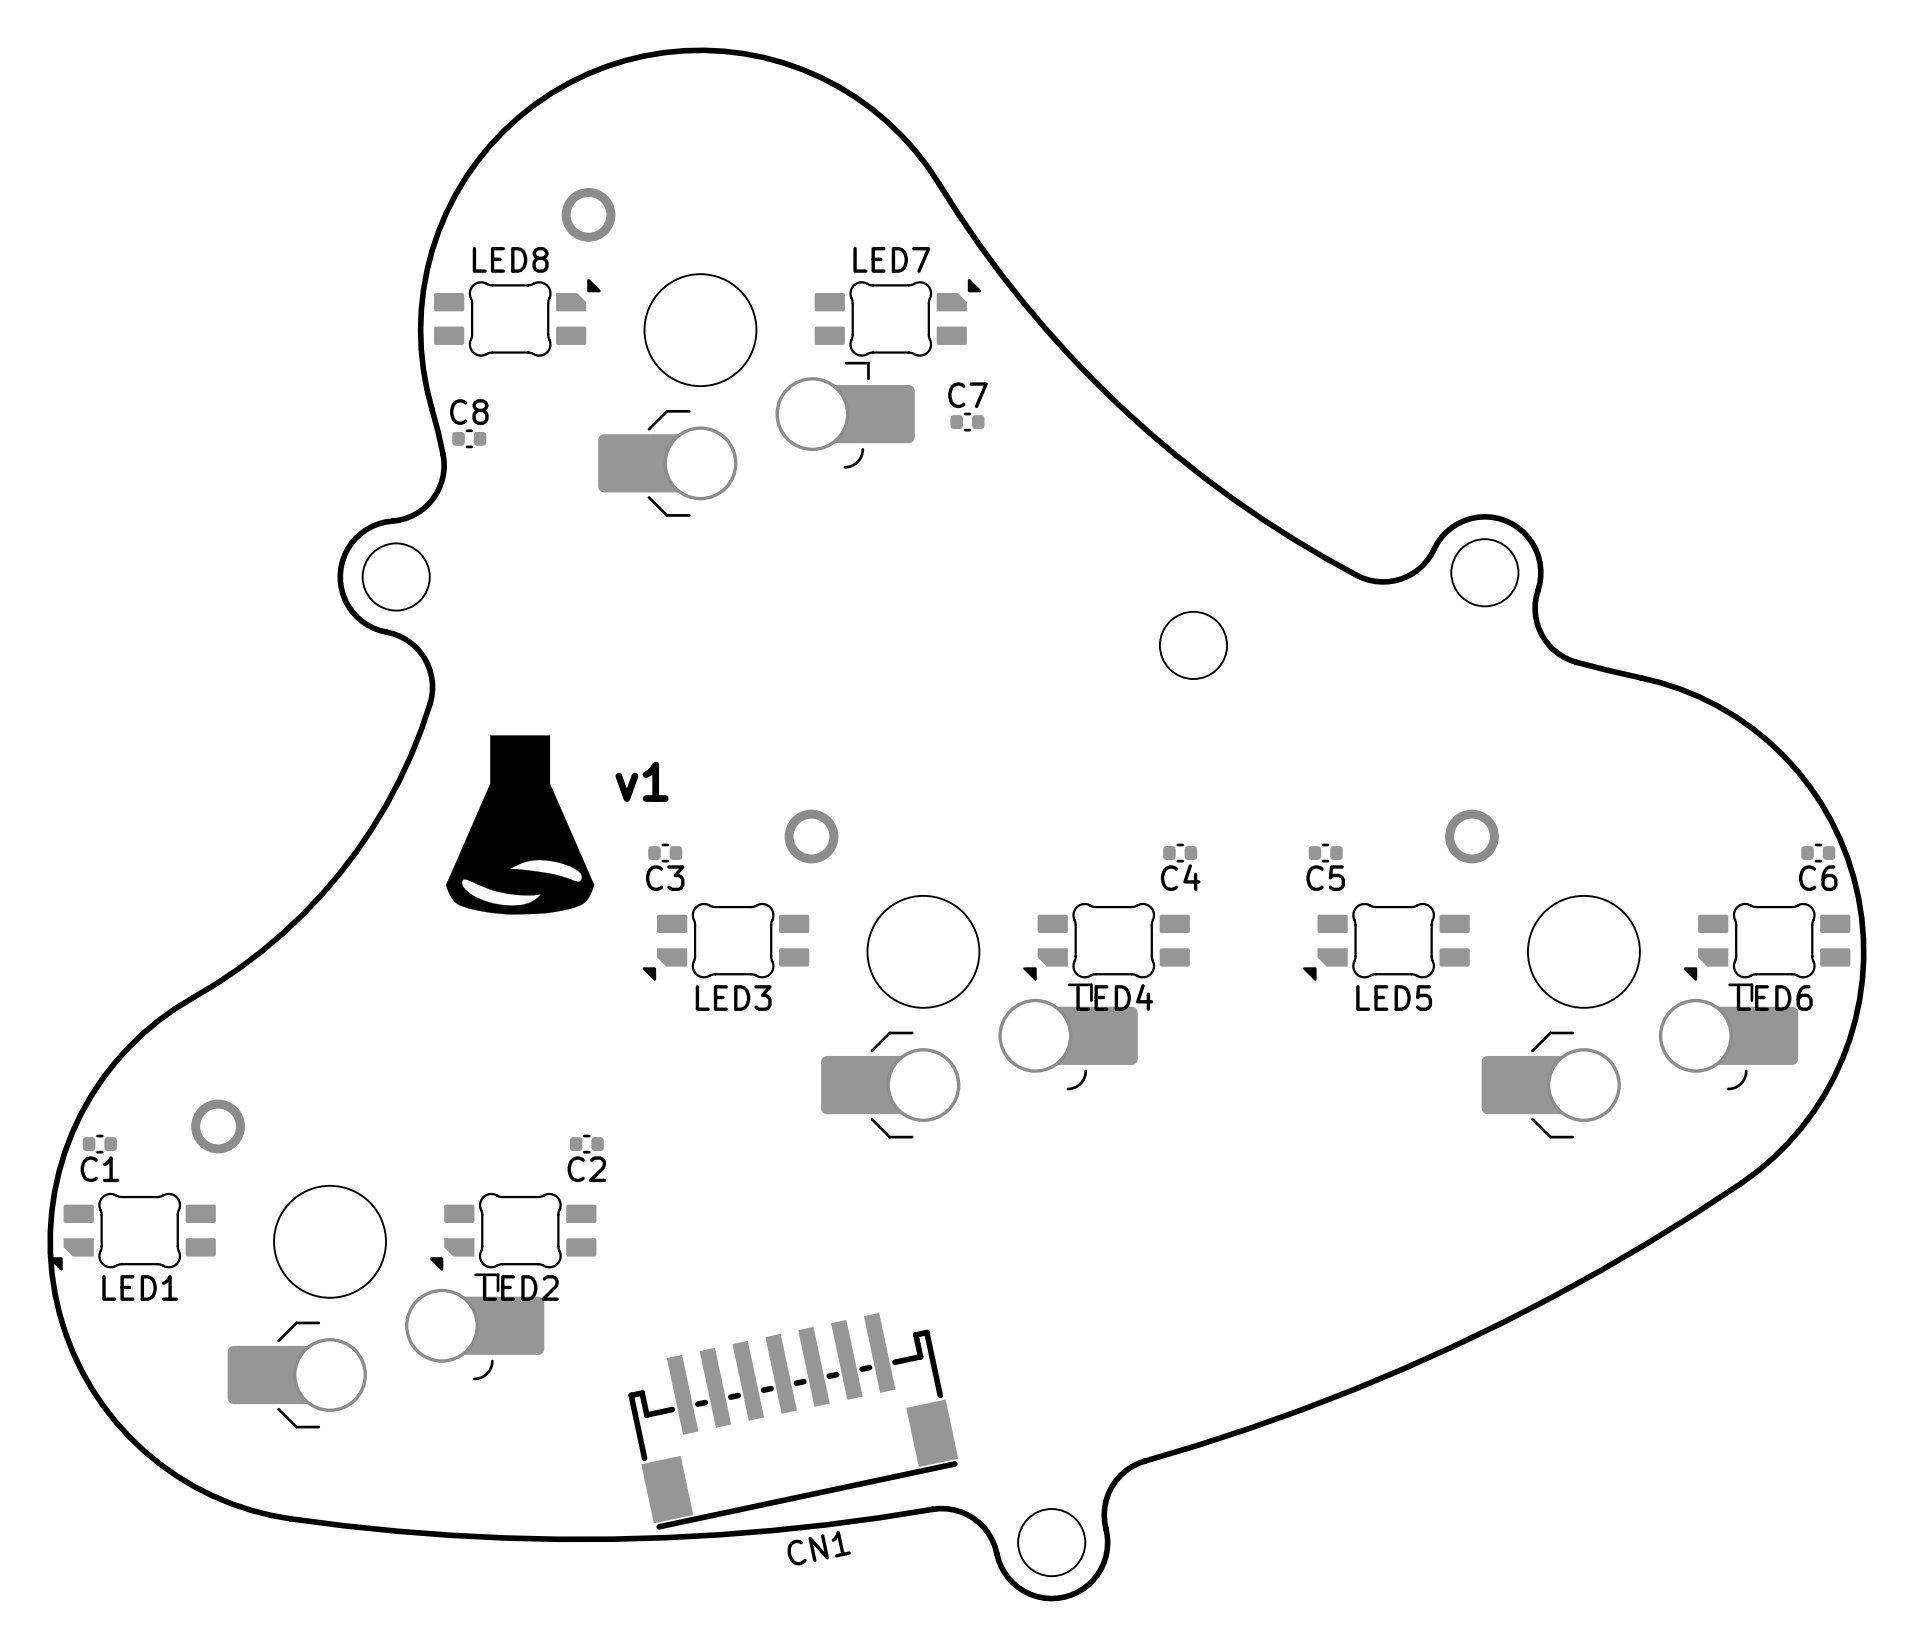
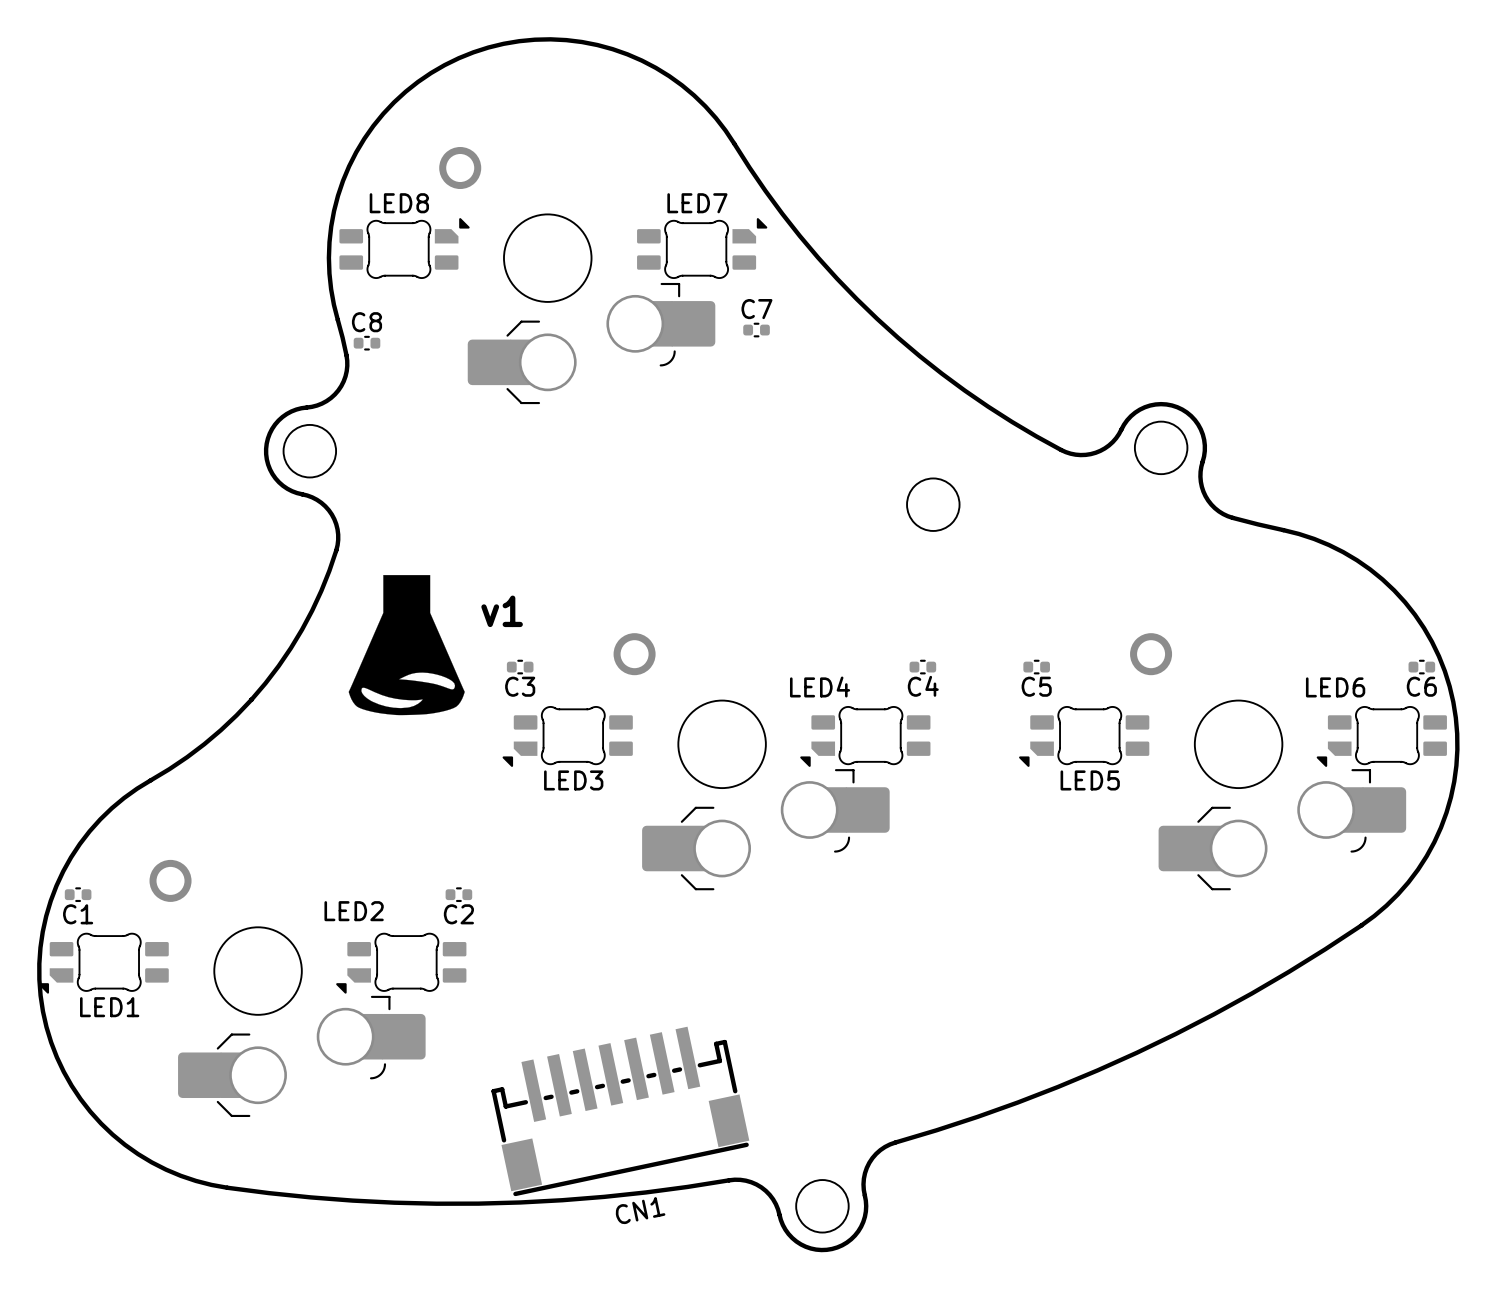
LED4 name position: LED4 (1114, 997) -> LED4 (820, 687)
LED6 name position: LED6 (1774, 998) -> LED6 (1335, 687)
LED2 name position: LED2 (520, 1287) -> LED2 (354, 911)

